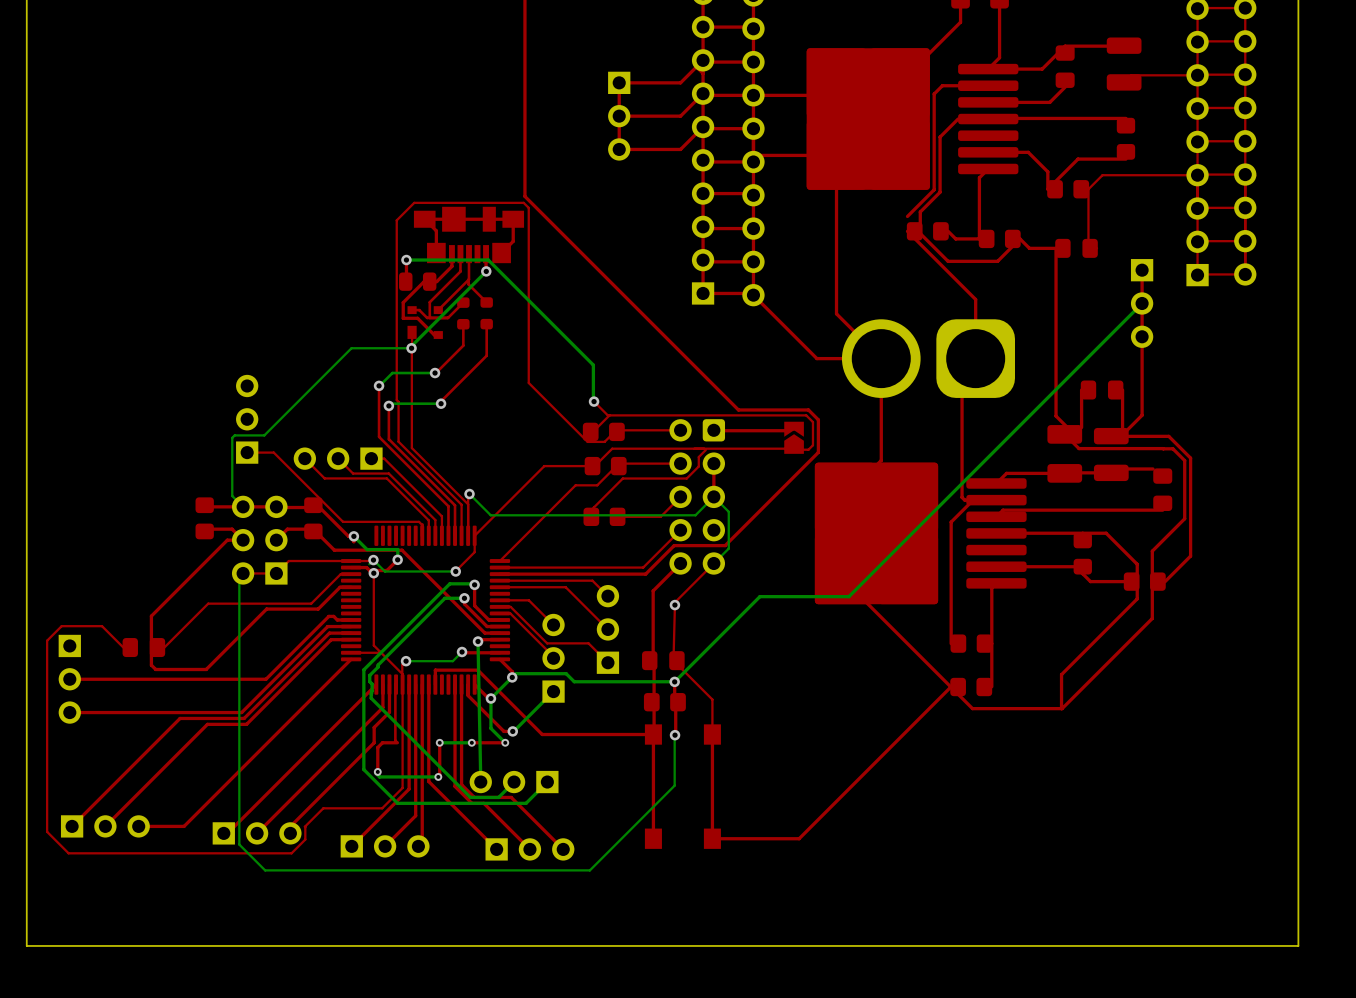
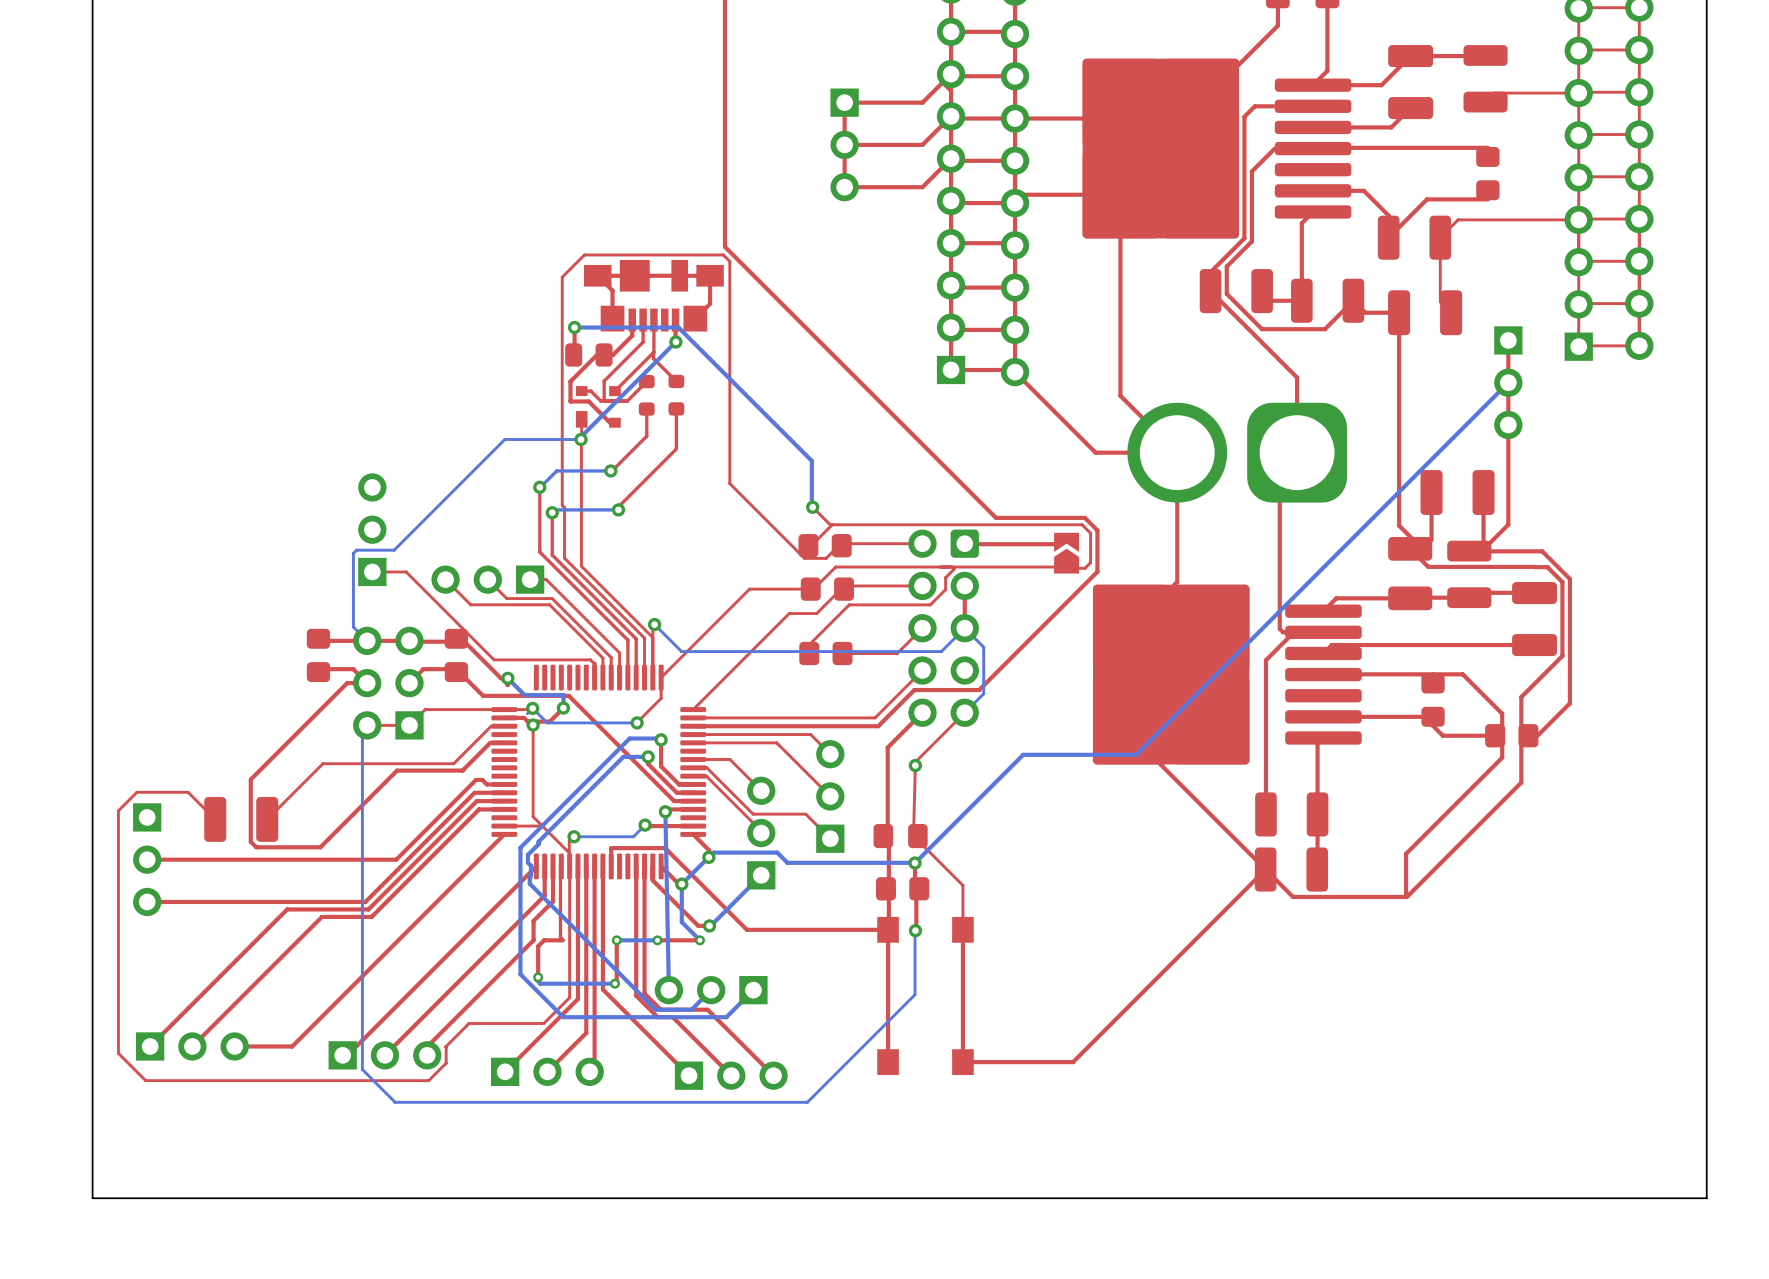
part footprint: [1055, 45, 1075, 88] -> [1388, 45, 1434, 120]
part footprint: [1047, 180, 1090, 199] -> [1377, 215, 1452, 260]
part footprint: [906, 222, 949, 241] -> [1199, 269, 1273, 314]
part footprint: [978, 229, 1021, 249] -> [1291, 278, 1365, 323]
part footprint: [1055, 238, 1098, 258] -> [1388, 290, 1463, 336]
part footprint: [1080, 380, 1124, 400] -> [1420, 470, 1495, 516]
part footprint: [1153, 468, 1173, 511] -> [1512, 582, 1558, 657]
part footprint: [950, 634, 993, 653] -> [1255, 792, 1329, 837]
part footprint: [122, 638, 166, 658] -> [204, 796, 279, 842]
part footprint: [950, 677, 993, 697] -> [1254, 847, 1329, 892]

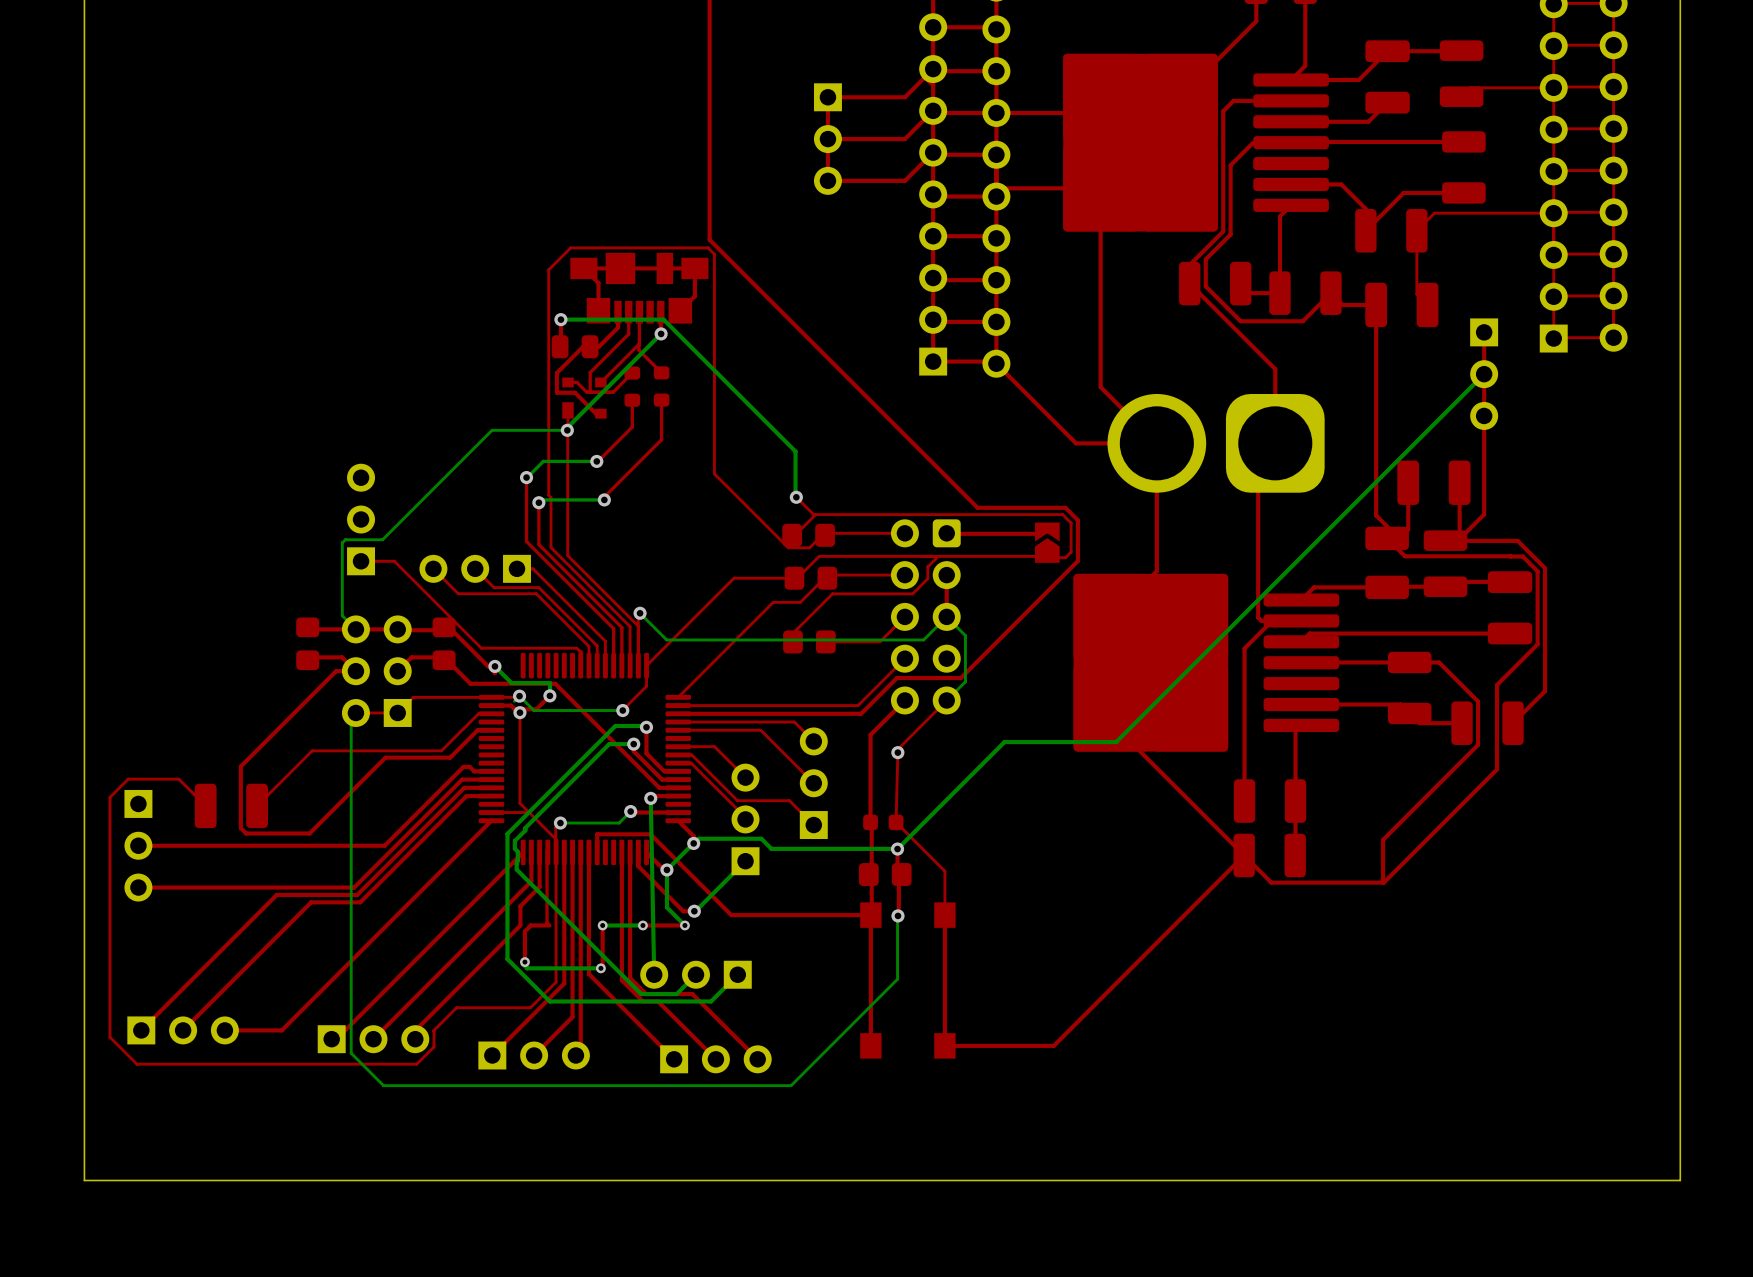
part footprint: [1476, 146, 1500, 201] -> [1442, 131, 1486, 204]
part footprint: [1421, 673, 1445, 727] -> [1387, 651, 1432, 725]
part footprint: [1485, 724, 1539, 748] -> [1451, 701, 1524, 746]
part footprint: [873, 823, 928, 849] -> [863, 814, 904, 831]

